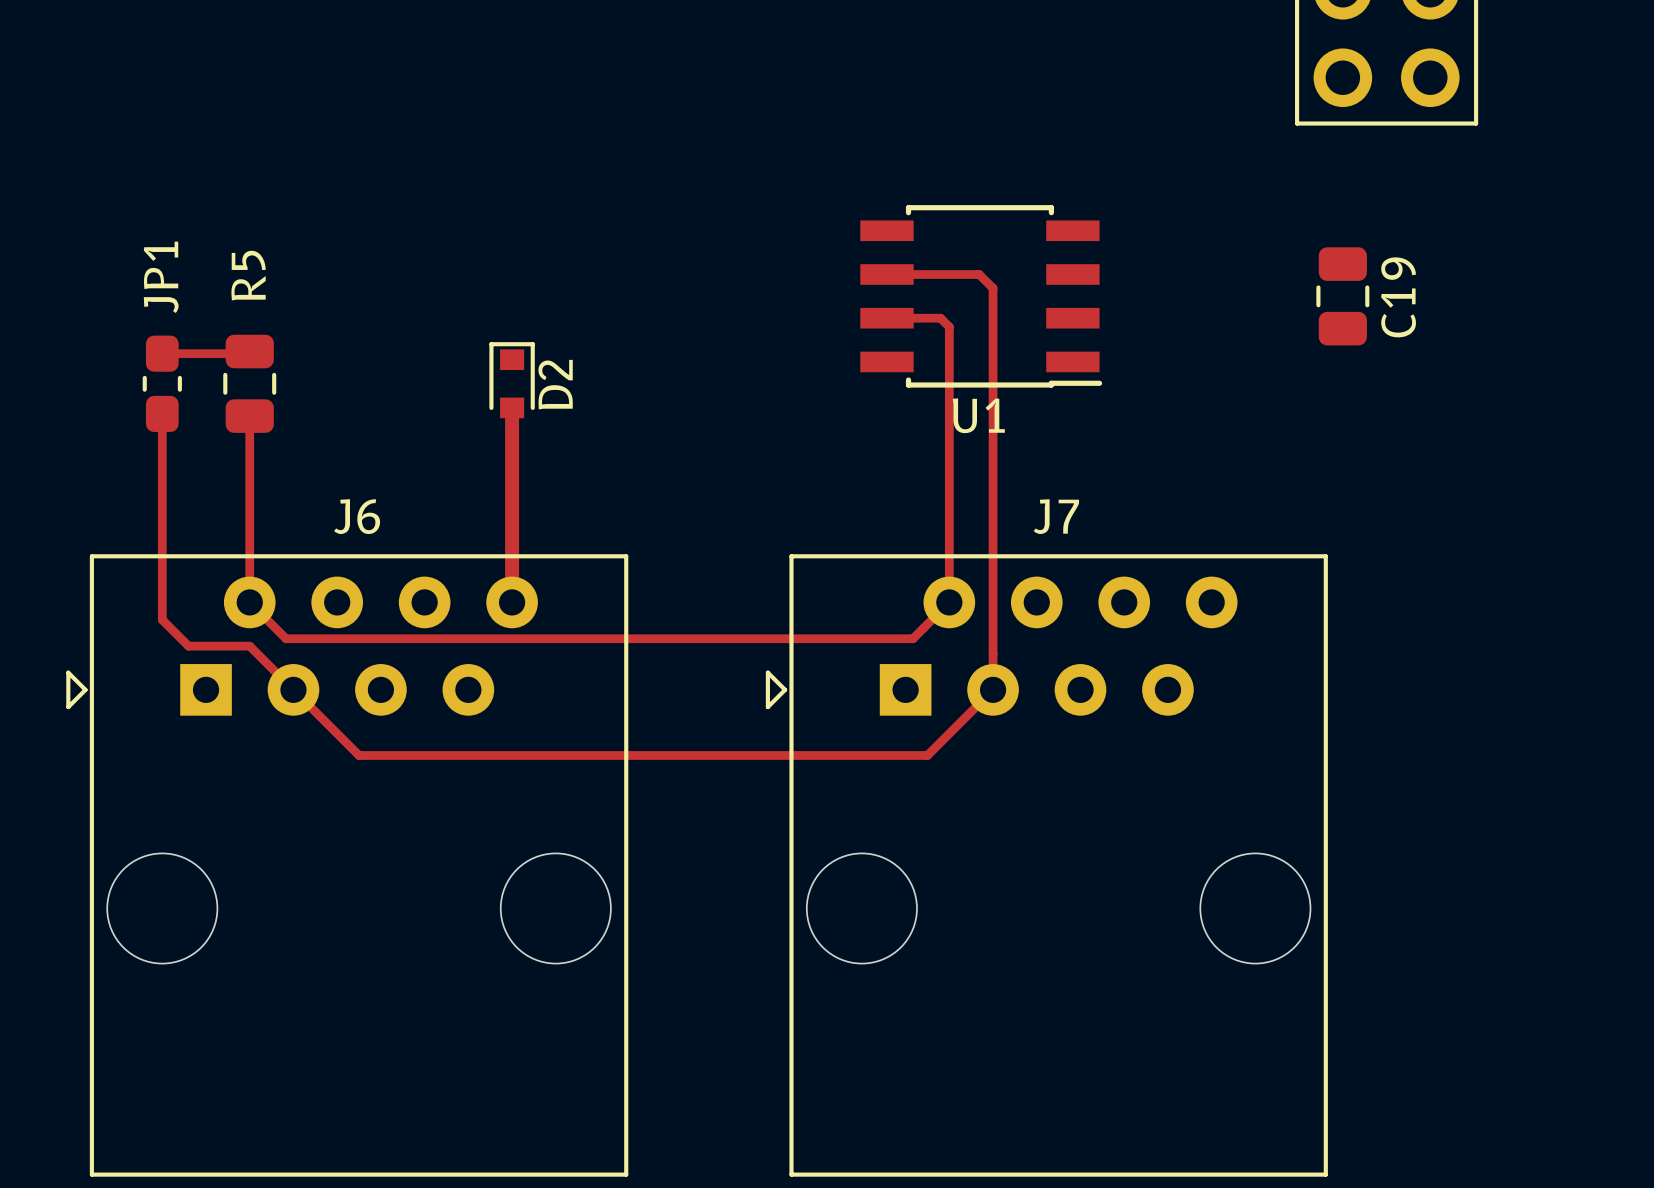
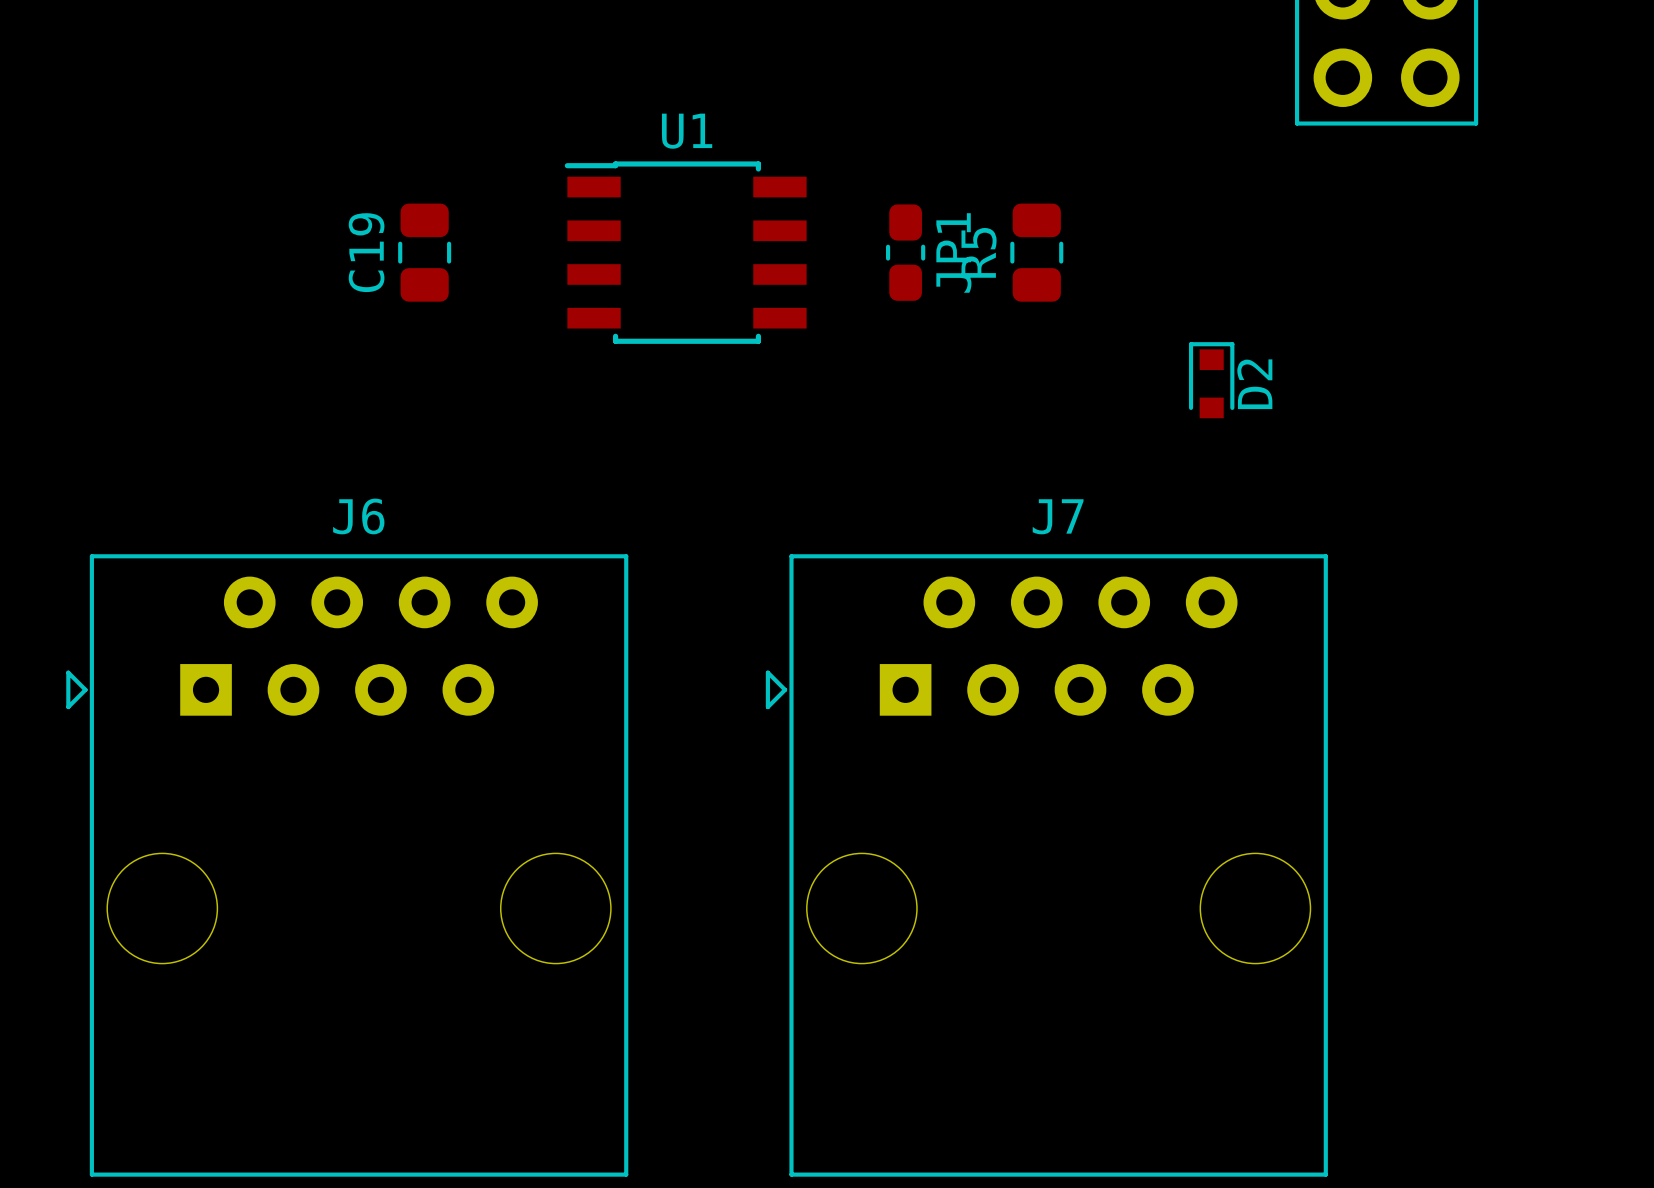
track: (886, 274) (979, 274) (993, 288) (993, 689) (927, 755) (359, 755) (249, 646) (188, 646) (162, 619) (162, 413) -> none
R5 name position: R5 (248, 275) -> R5 (979, 252)
JP1 name position: JP1 (161, 277) -> JP1 (953, 252)
U1 rotation: 0° (981, 296) -> 180° (685, 252)
U1 position: (981, 296) -> (685, 252)
C19 position: (1342, 296) -> (424, 252)
C19 name position: C19 (1398, 297) -> C19 (366, 252)
track: (886, 318) (940, 318) (949, 326) (949, 602) (913, 638) (286, 638) (249, 602) (249, 416) -> none
track: (249, 351) (247, 353) (162, 353) -> none
D2 position: (512, 380) -> (1211, 380)
JP1 position: (162, 383) -> (905, 252)
R5 position: (249, 383) -> (1036, 252)
track: (512, 407) (512, 602) -> none

